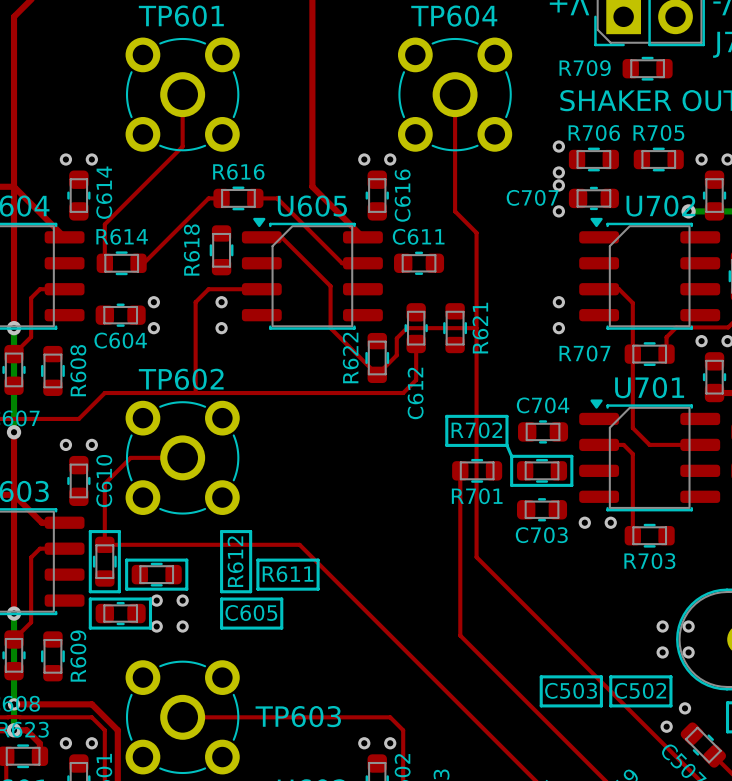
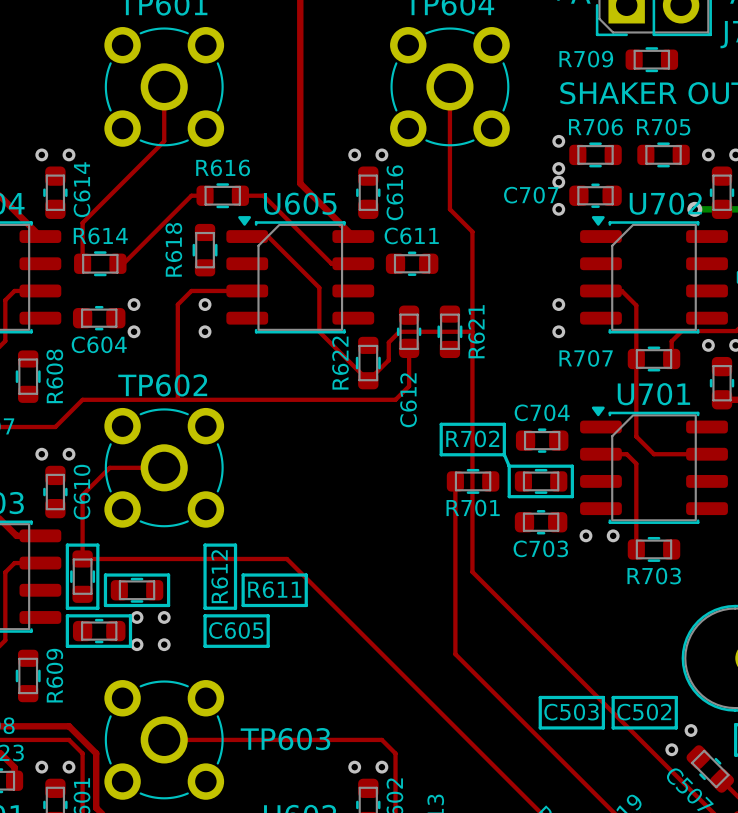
via: (662, 626) -> none
via: (688, 626) -> none
via: (662, 652) -> none
via: (688, 652) -> none

